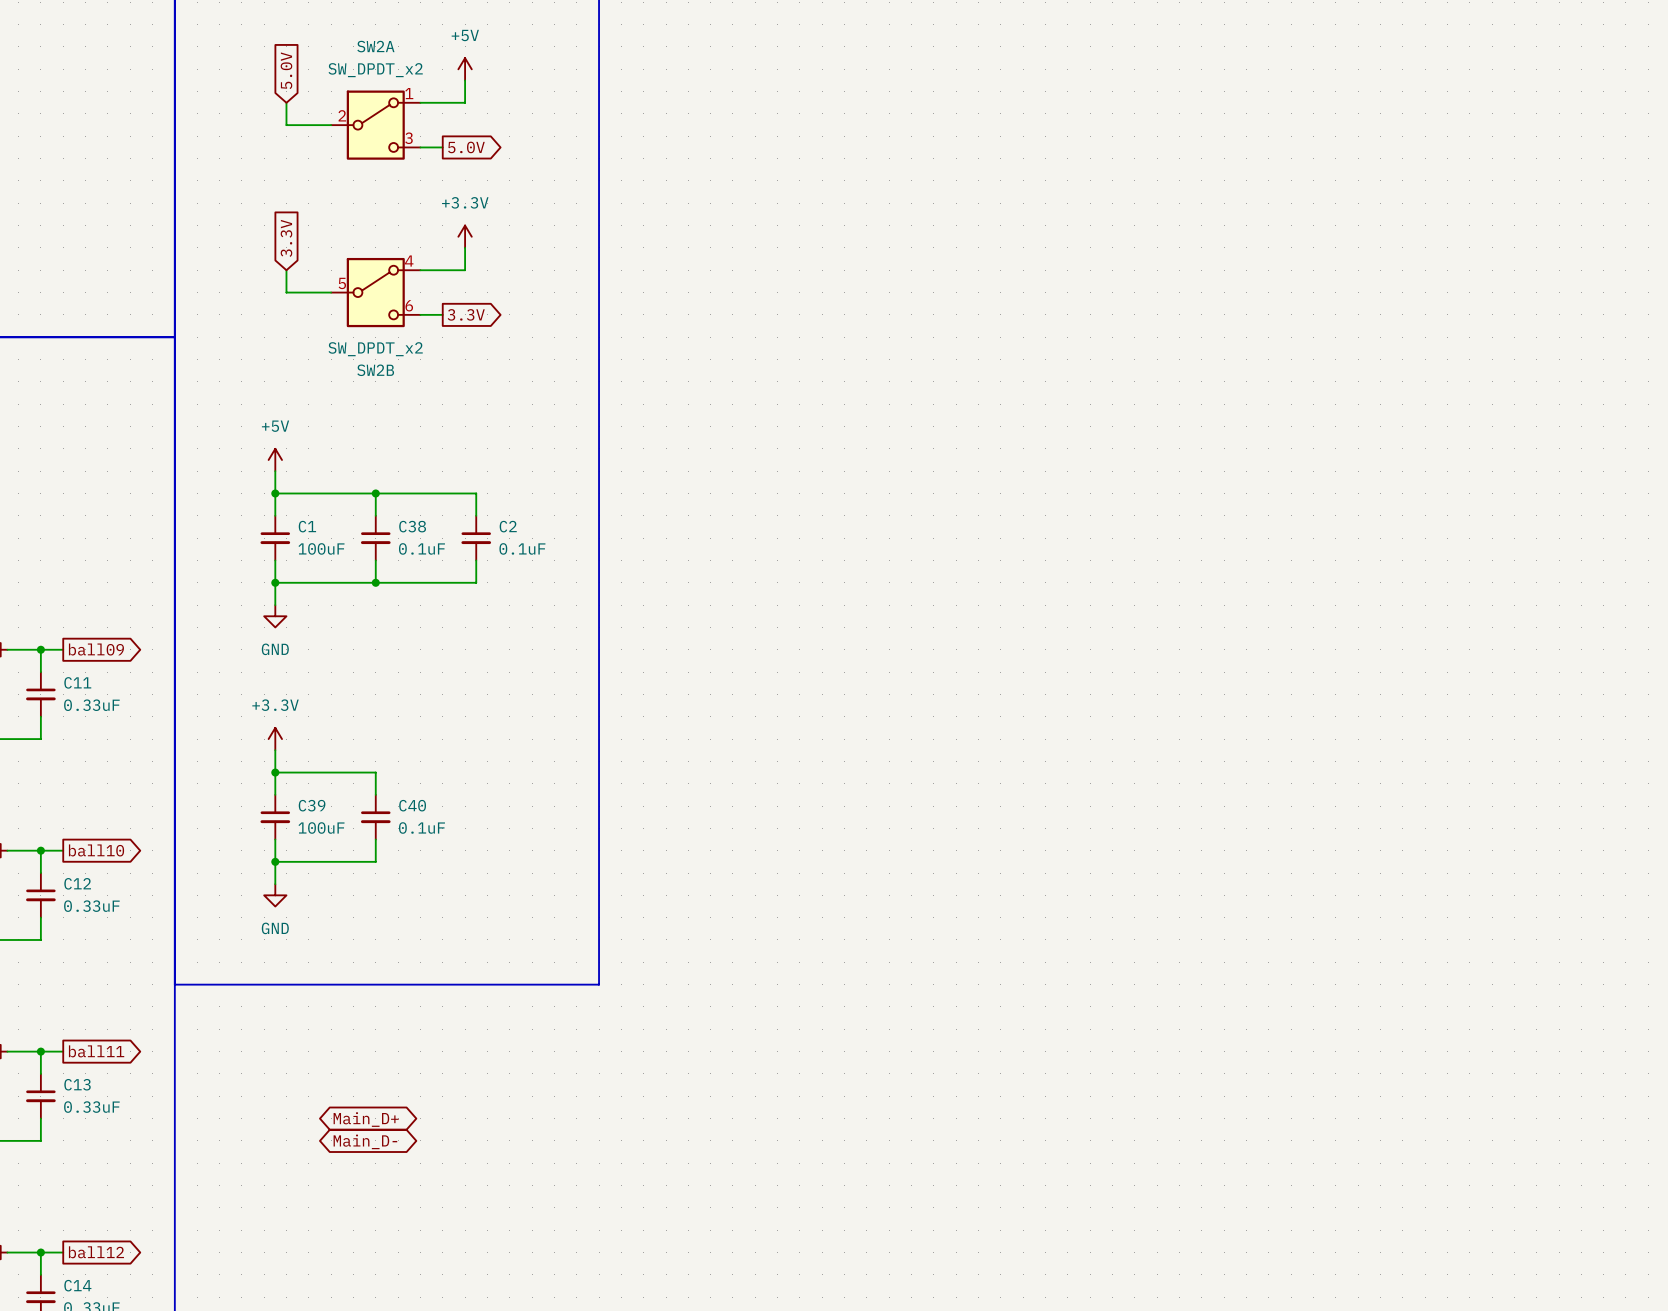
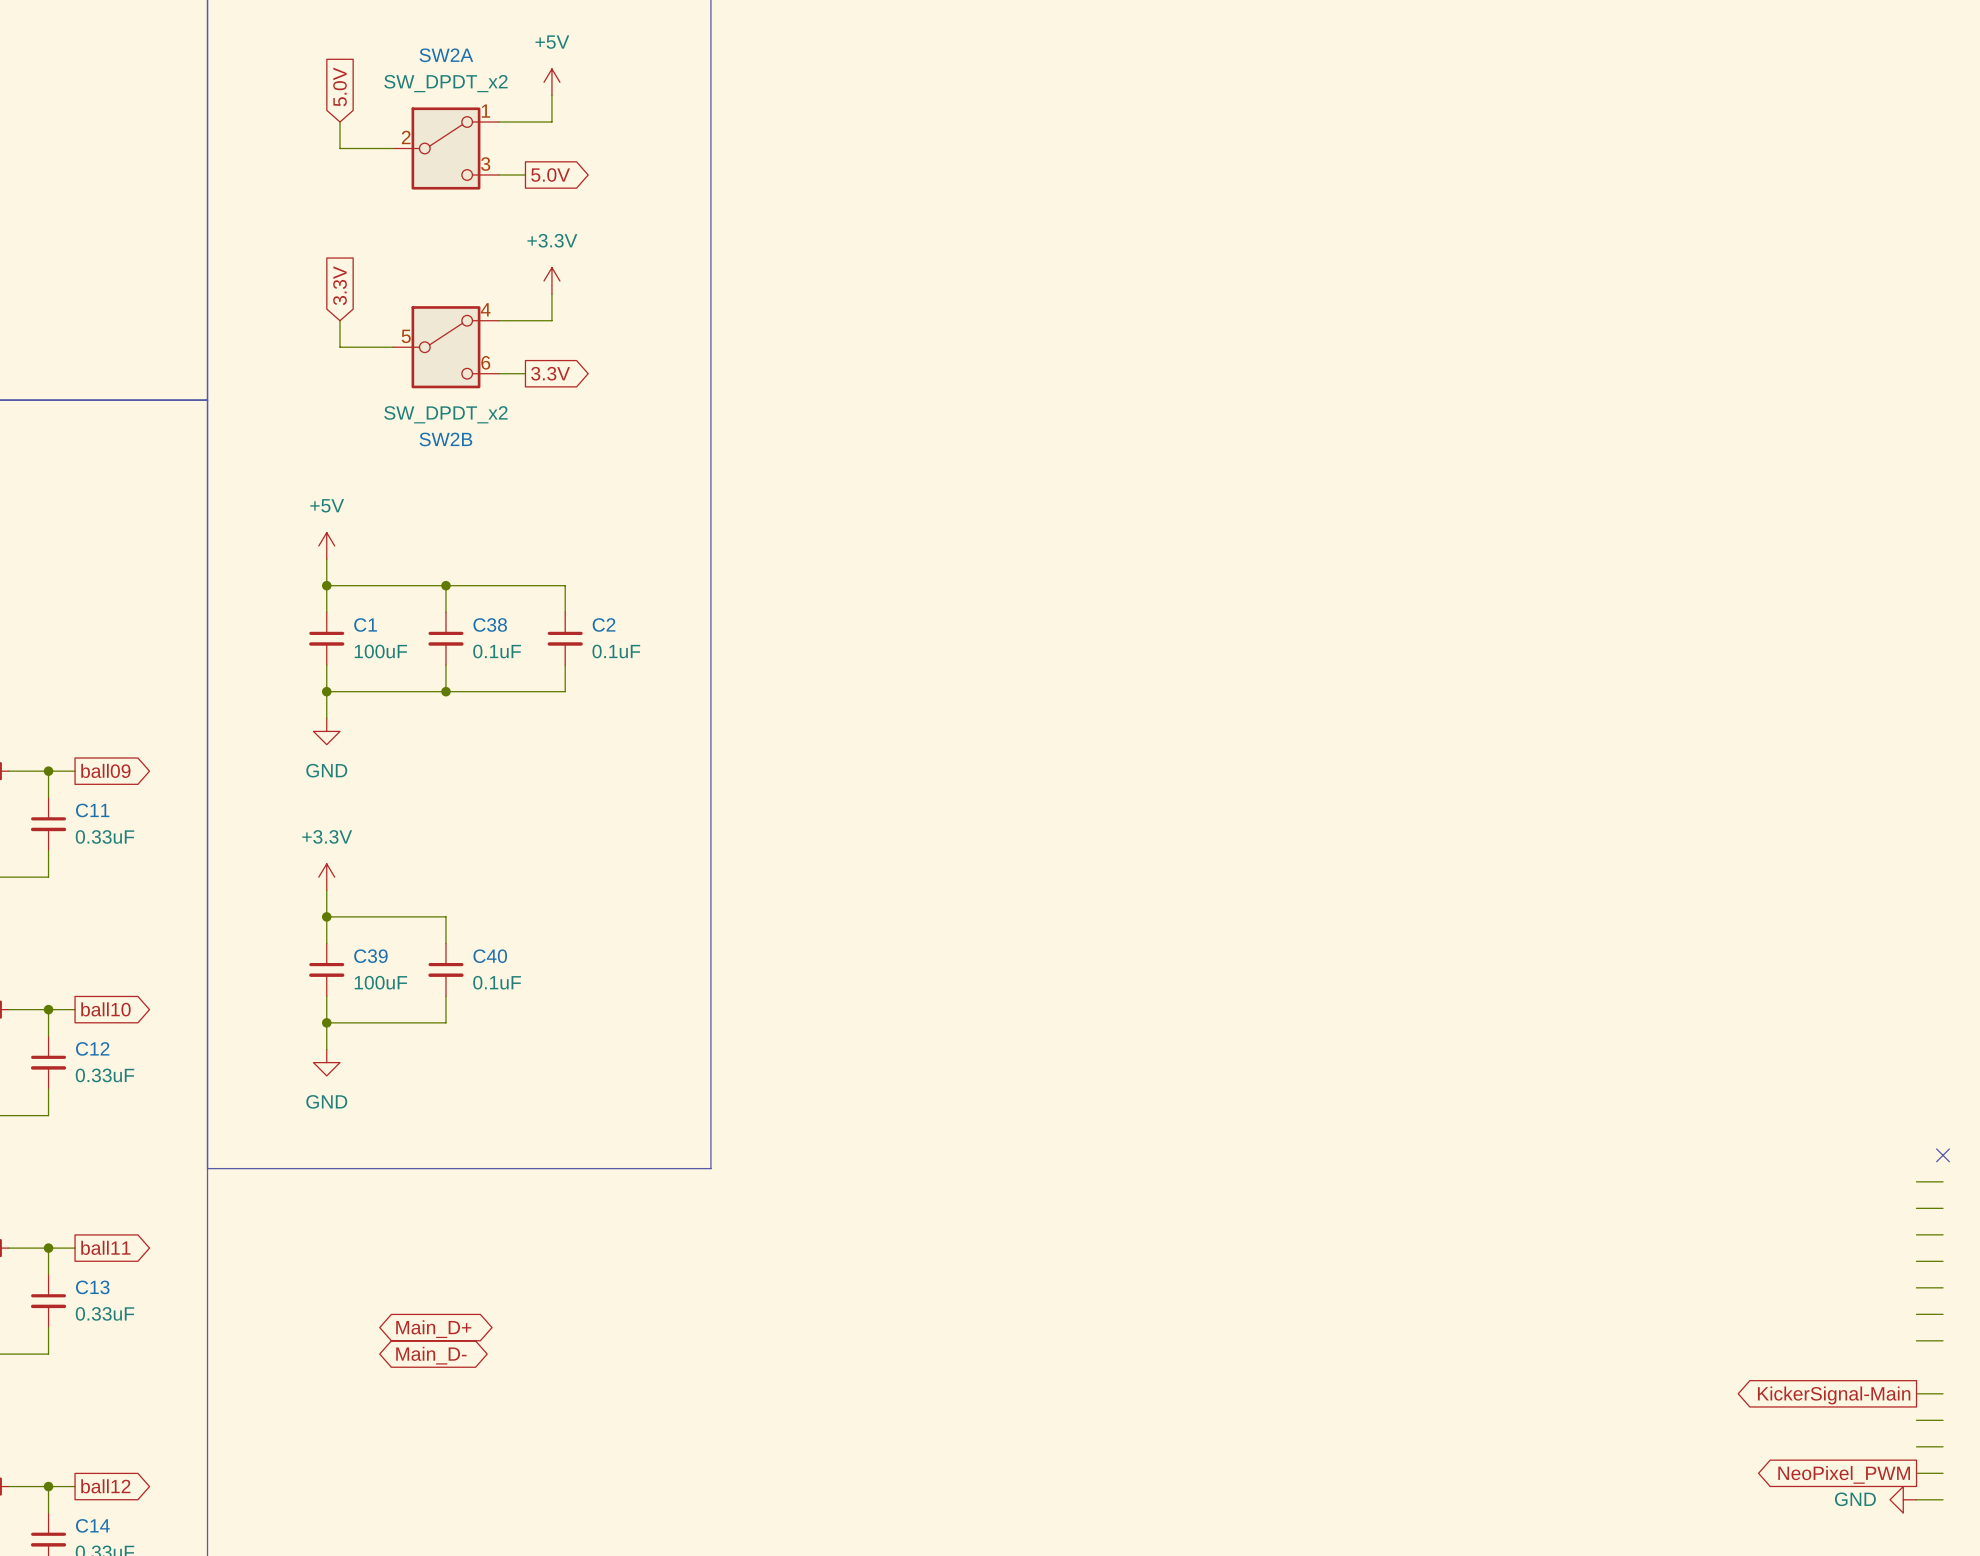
no-connect mark: none -> (1943, 1155)
wire: none -> (1916, 1181) (1943, 1181)
wire: none -> (1916, 1208) (1943, 1208)
wire: none -> (1916, 1234) (1943, 1234)
wire: none -> (1916, 1261) (1943, 1261)
wire: none -> (1916, 1287) (1943, 1287)
wire: none -> (1916, 1314) (1943, 1314)
wire: none -> (1916, 1340) (1943, 1340)
wire: none -> (1916, 1393) (1943, 1393)
global label: none -> KickerSignal-Main (1834, 1395)
wire: none -> (1916, 1420) (1943, 1420)
wire: none -> (1916, 1446) (1943, 1446)
wire: none -> (1916, 1473) (1943, 1473)
global label: none -> NeoPixel_PWM (1844, 1474)
power symbol: none -> GND (1903, 1499)
wire: none -> (1916, 1499) (1943, 1499)

